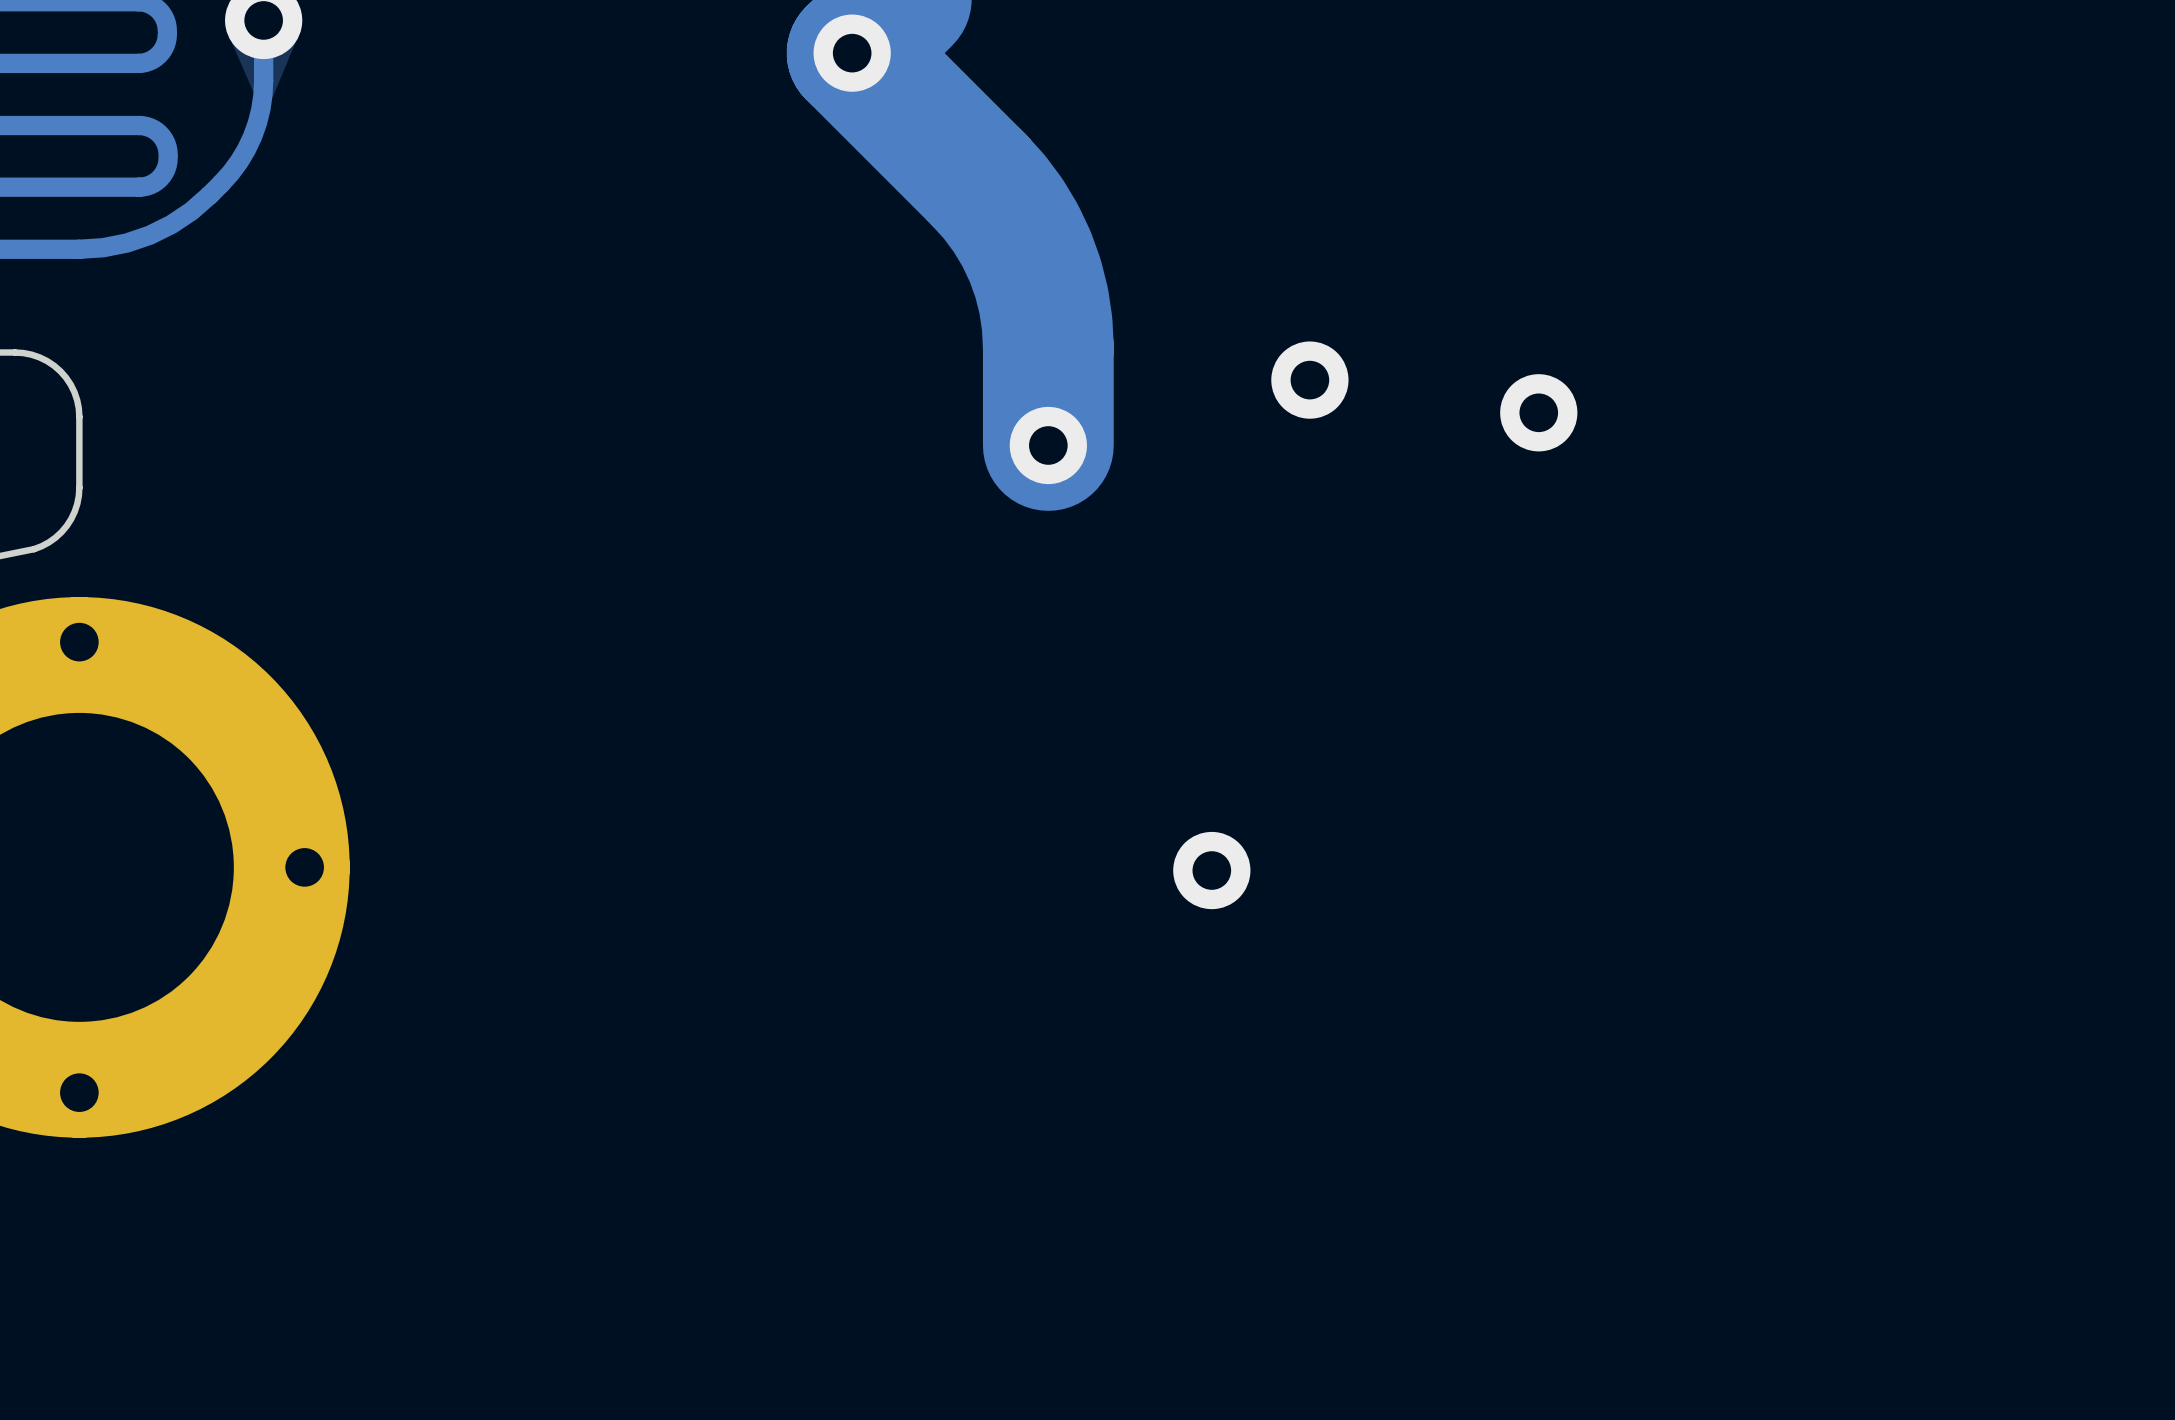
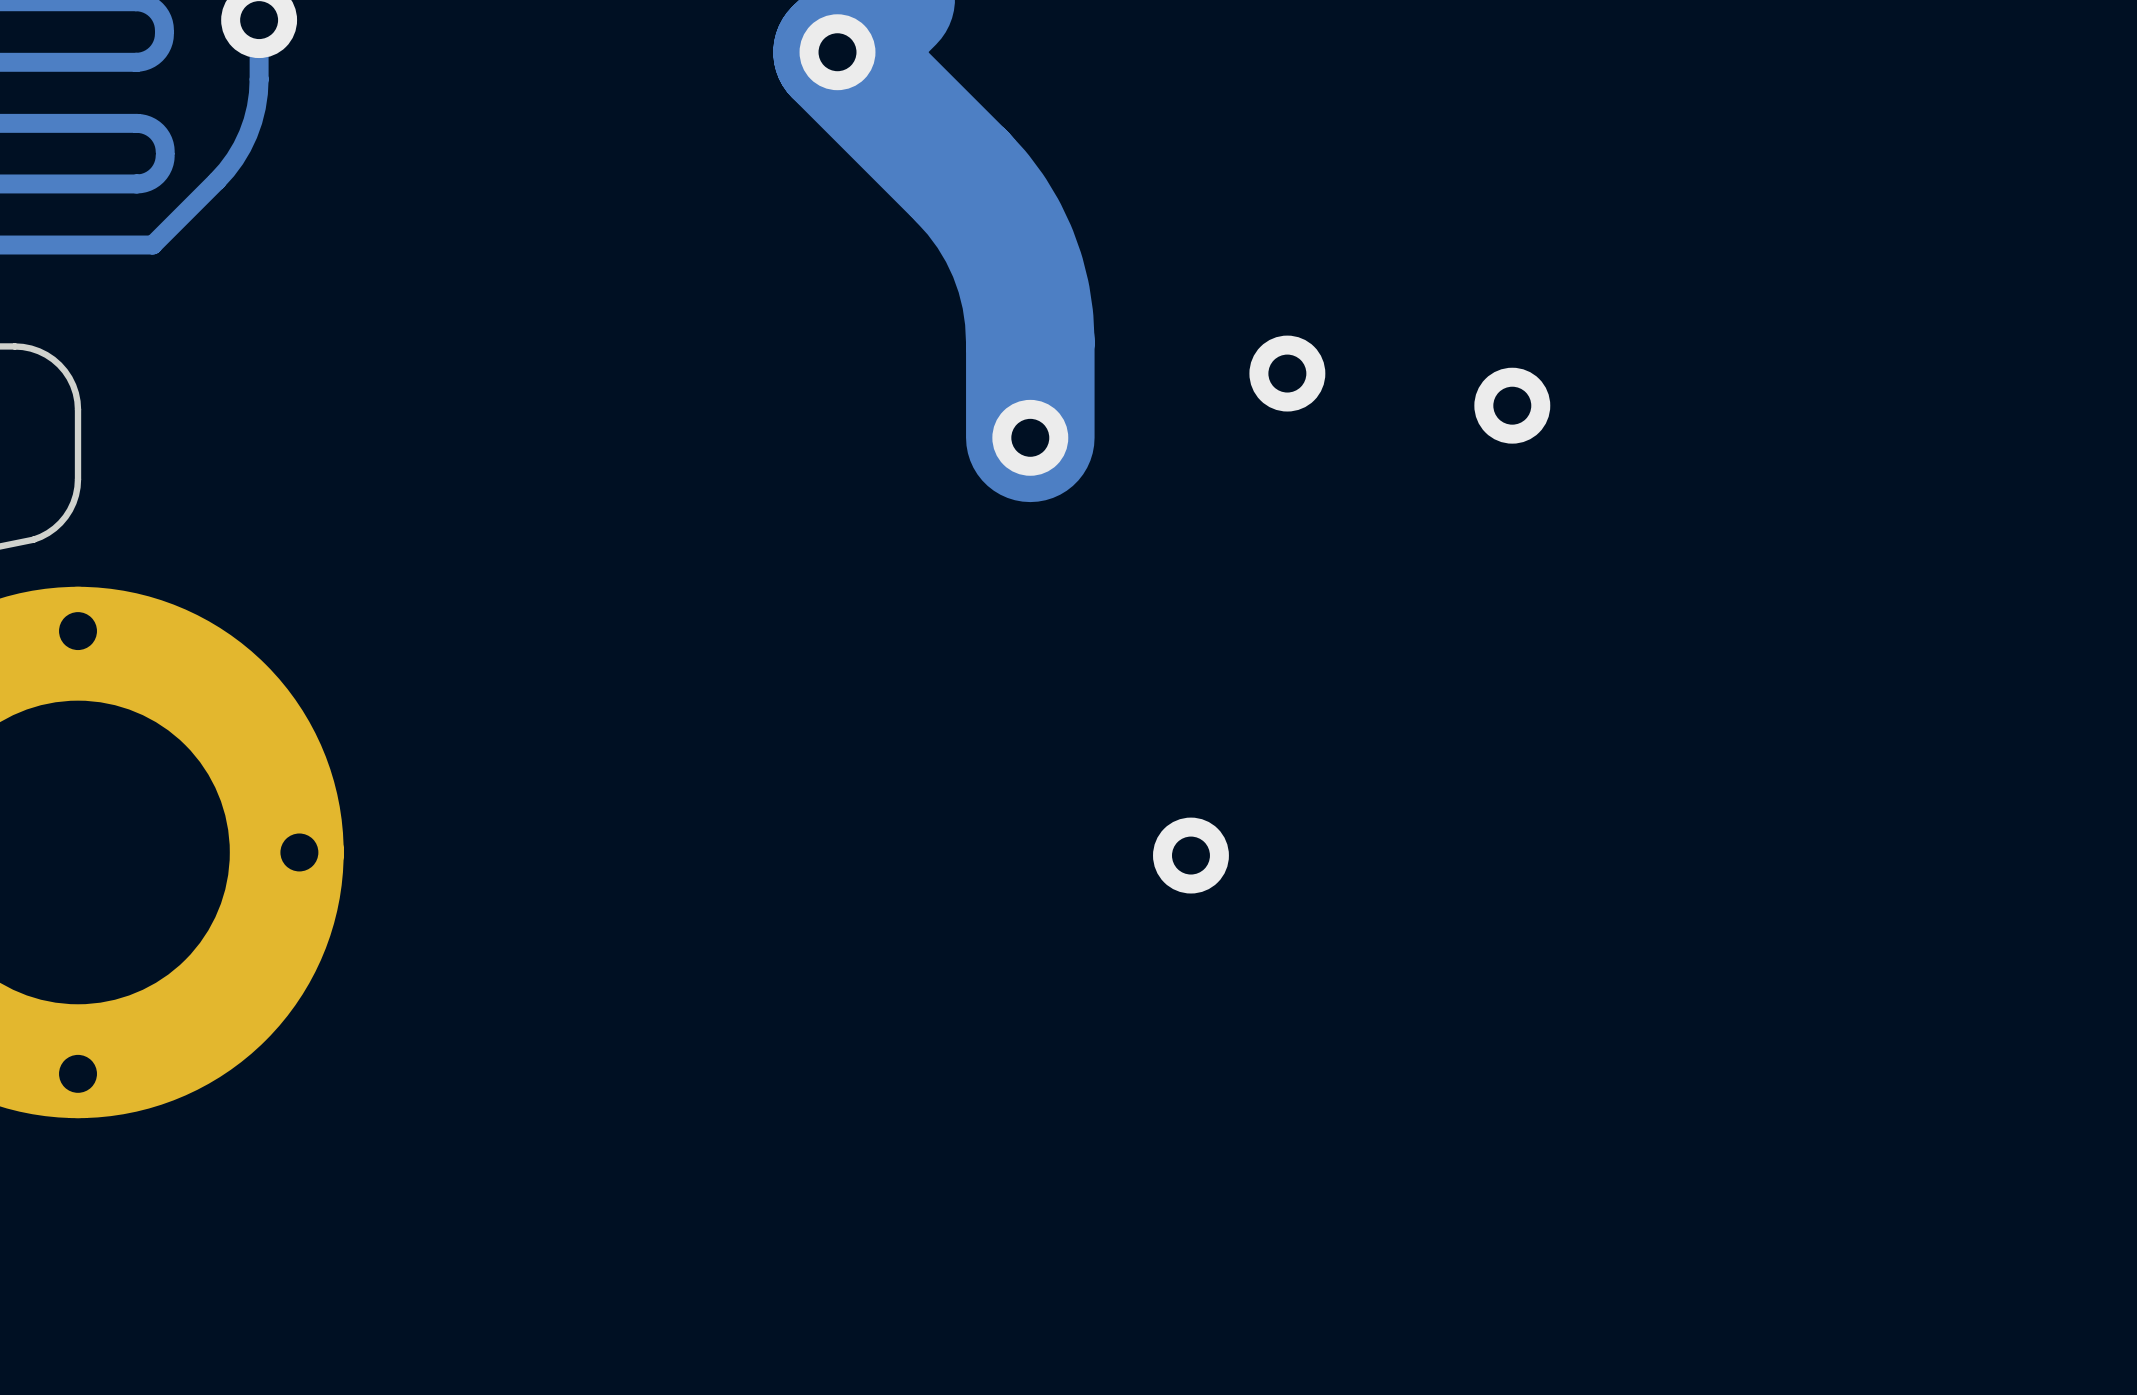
track: (209, 195) (191, 211) (171, 224) (149, 235) (126, 243) (103, 247) (79, 249) -> (205, 191) (152, 245) (77, 245)

